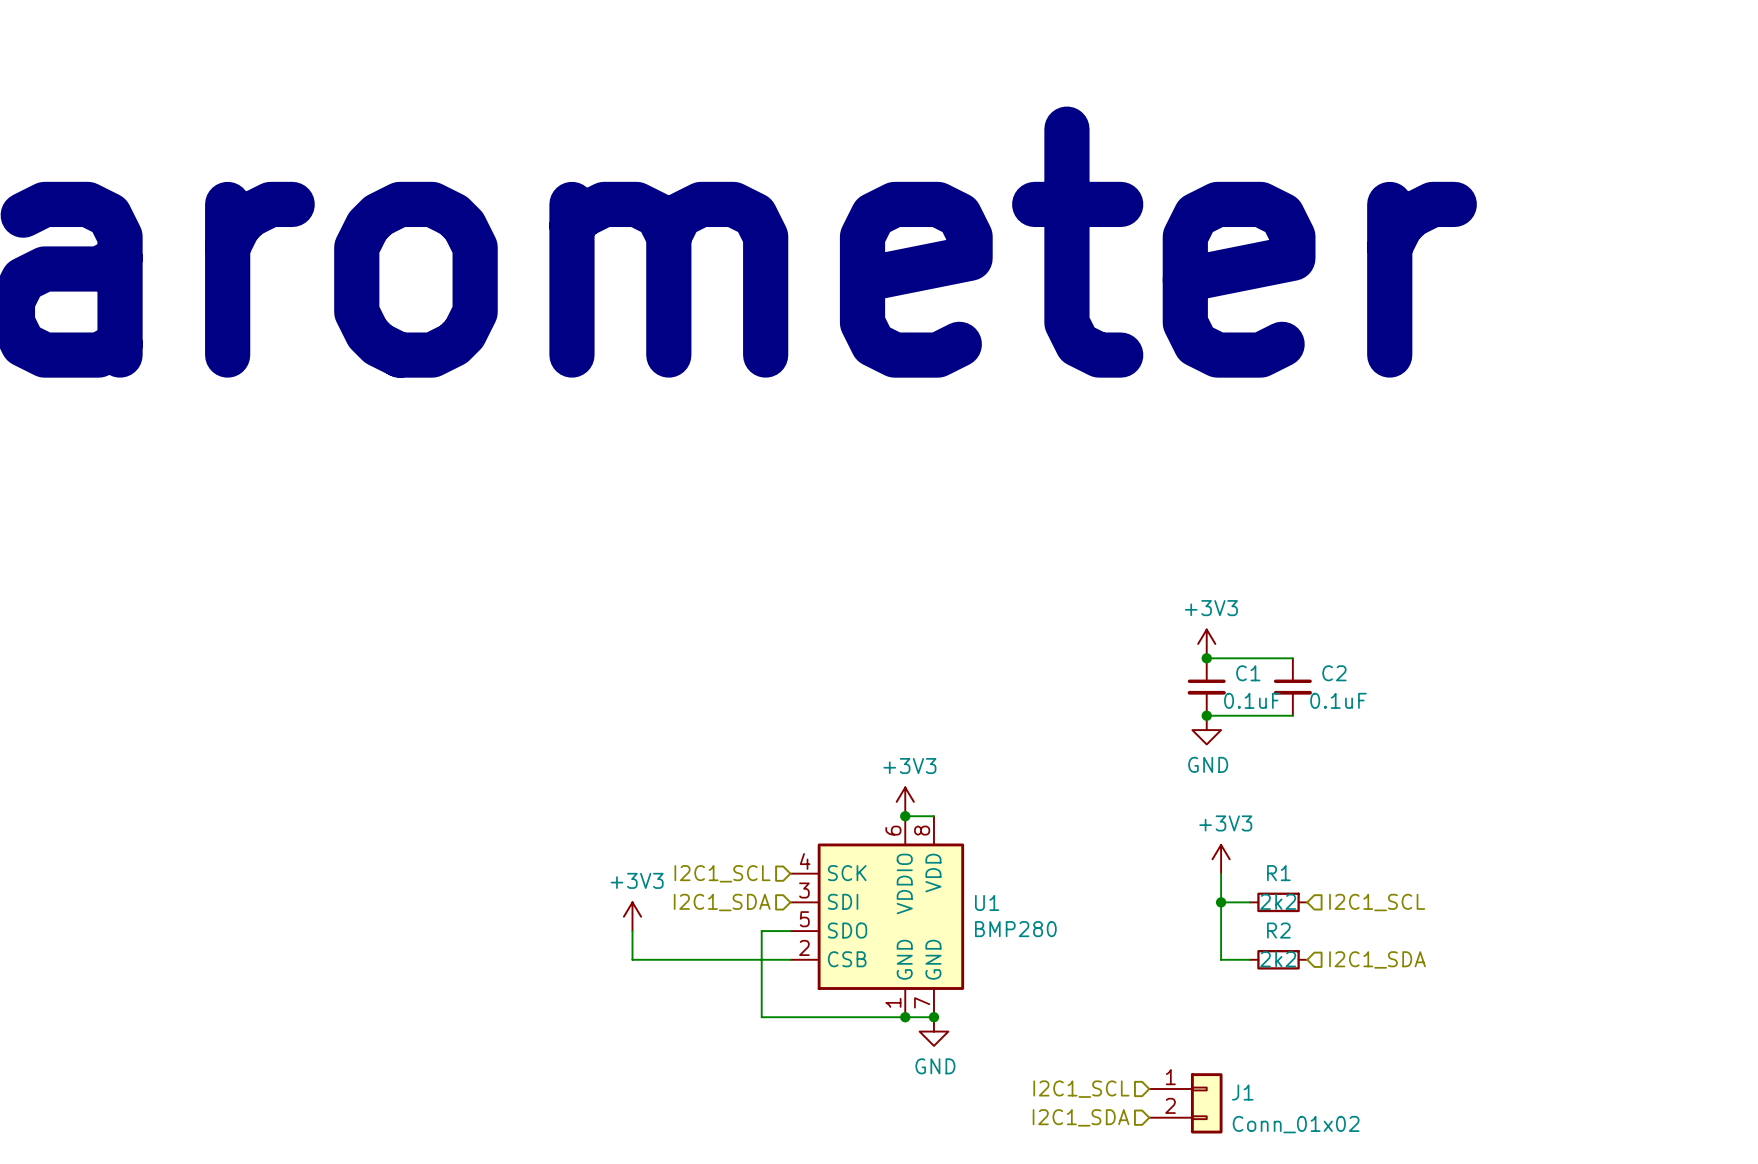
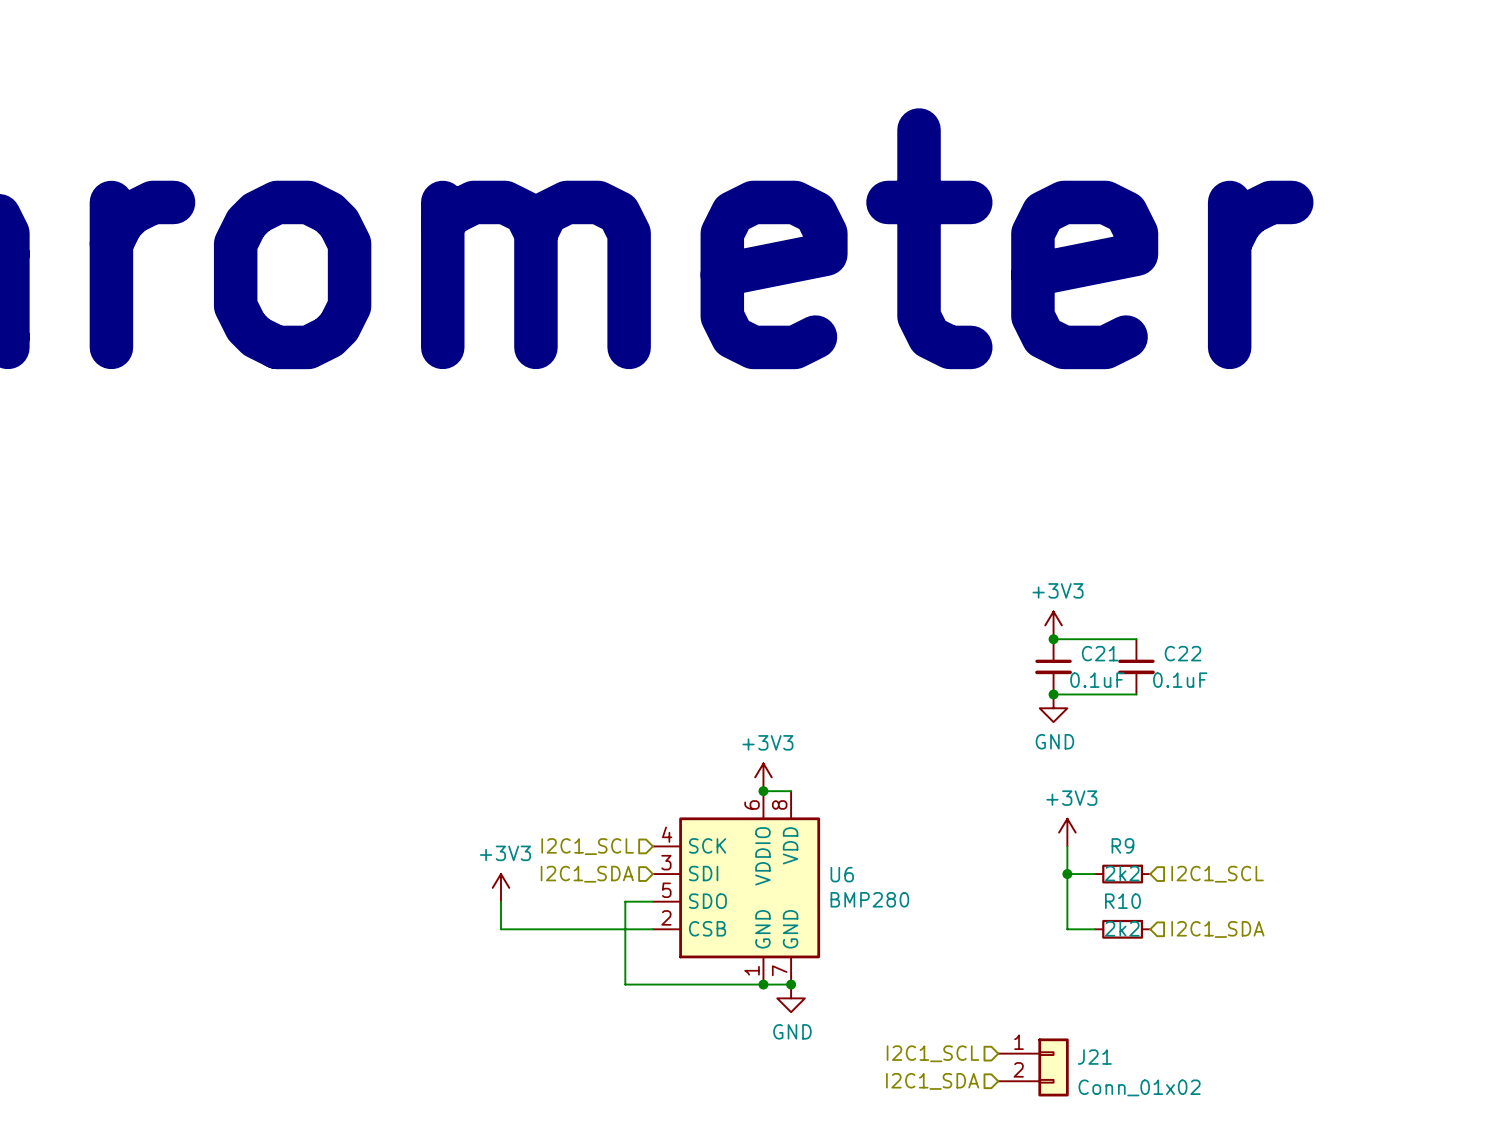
C1 name: C1 (1248, 673) -> C21 (1100, 653)
C2 name: C2 (1334, 673) -> C22 (1183, 653)
R1 name: R1 (1278, 873) -> R9 (1122, 845)
U1 name: U1 (987, 902) -> U6 (842, 874)
R2 name: R2 (1278, 930) -> R10 (1122, 901)
J1 name: J1 (1242, 1092) -> J21 (1094, 1057)

